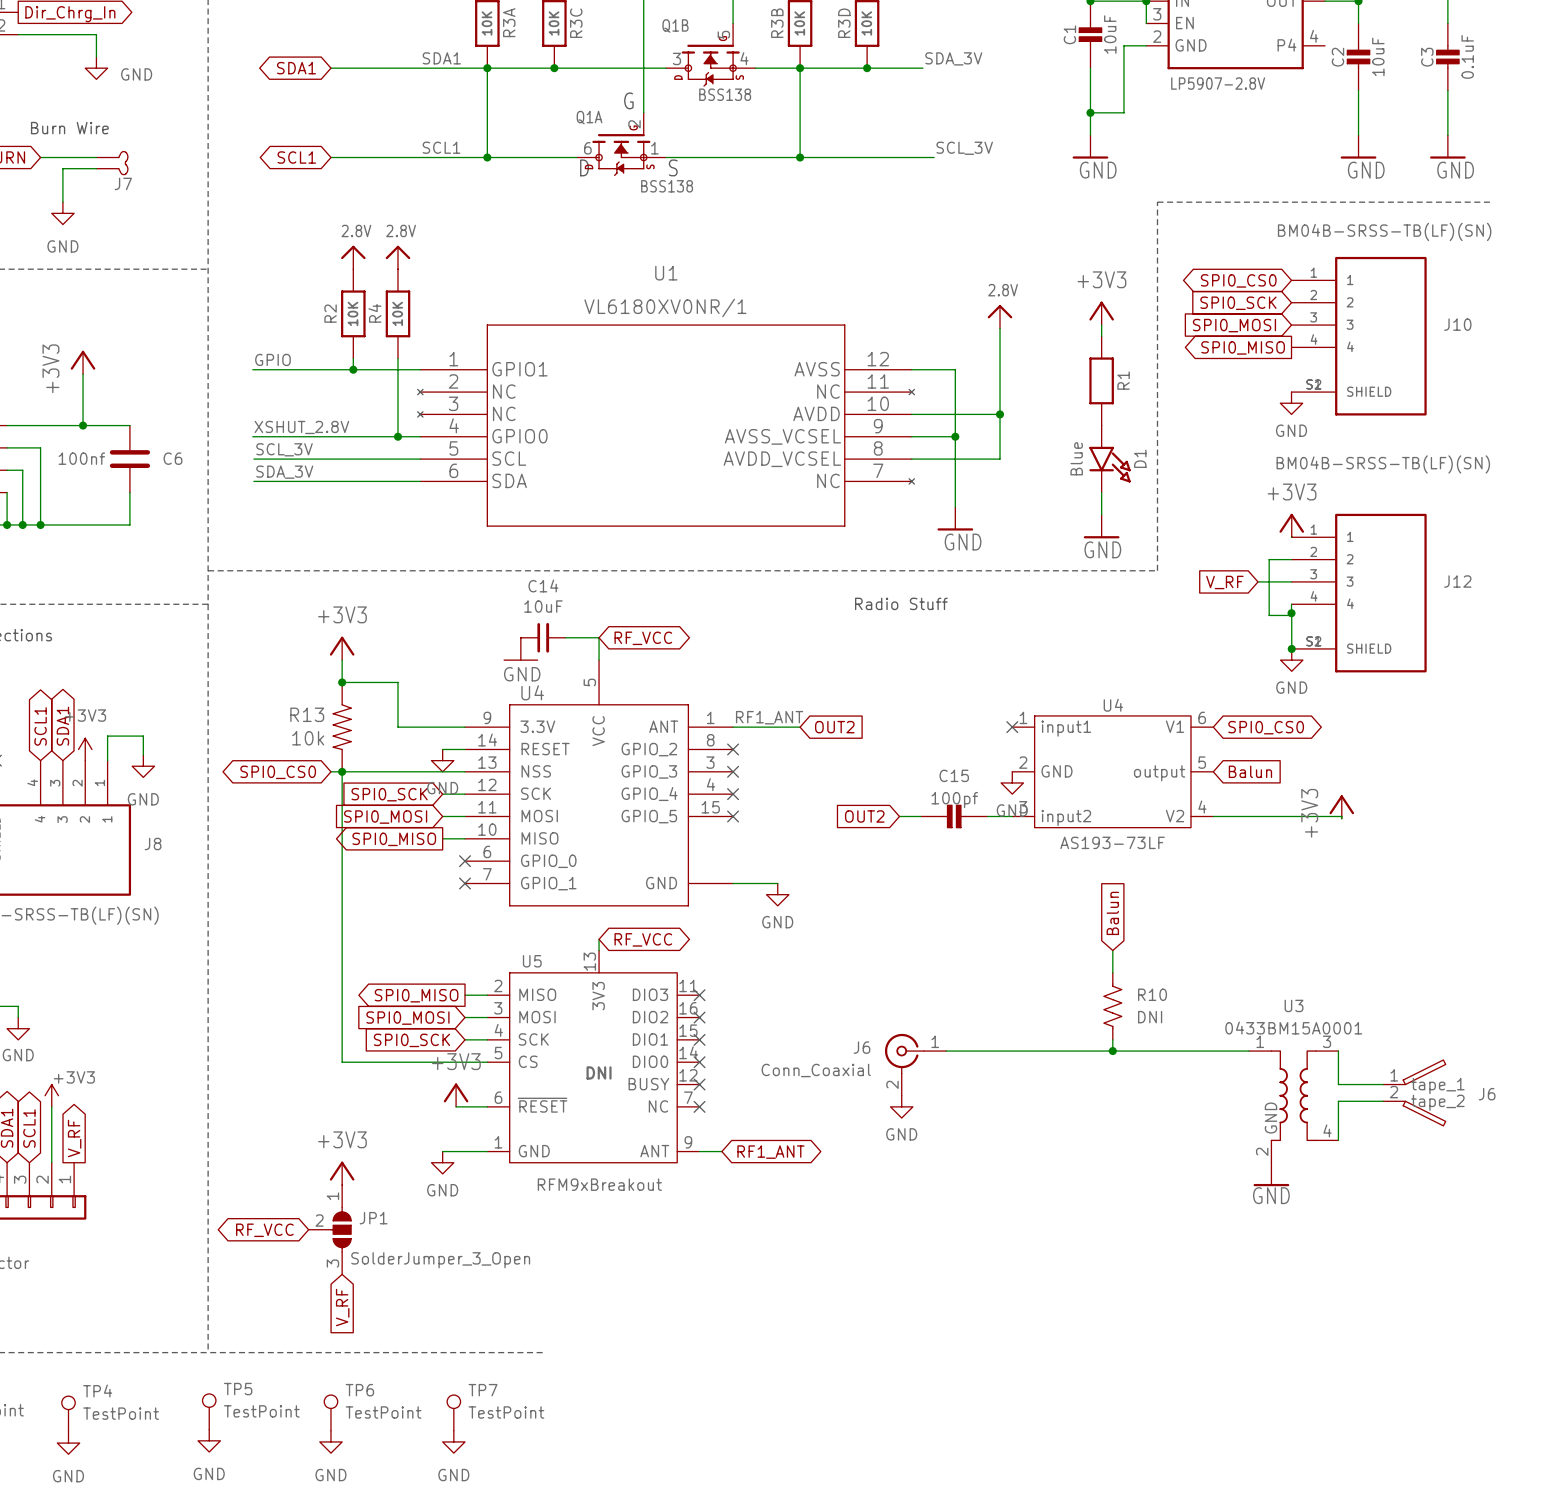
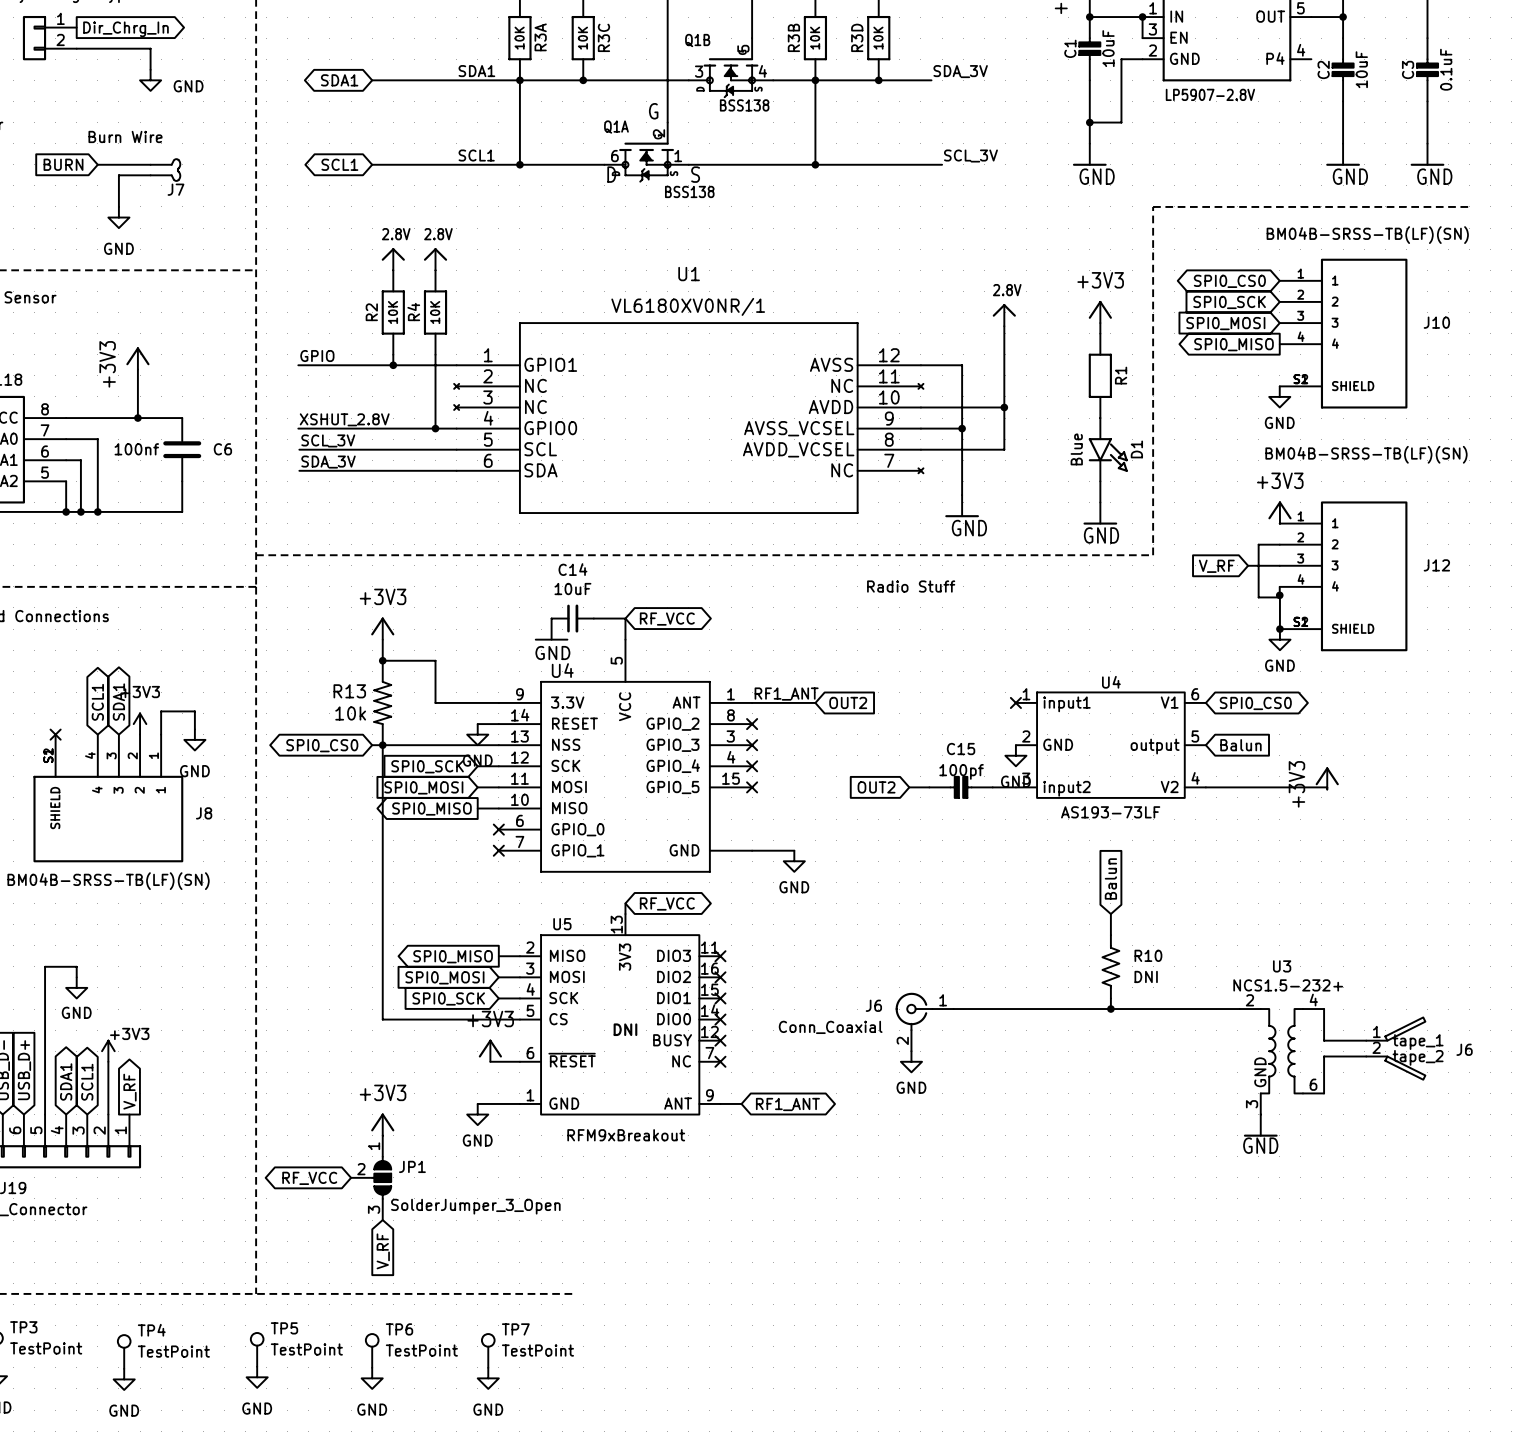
U3 value: 0433BM15A0001 (1293, 1028) -> NCS1.5-232+ (1288, 985)
U3 pin number: 1 (1260, 1041) -> 2 (1249, 1000)
U3 pin number: 3 (1326, 1041) -> 4 (1313, 1000)
U3 pin number: 4 (1327, 1130) -> 6 (1313, 1084)
U3 pin number: 2 (1262, 1151) -> 3 (1252, 1104)

